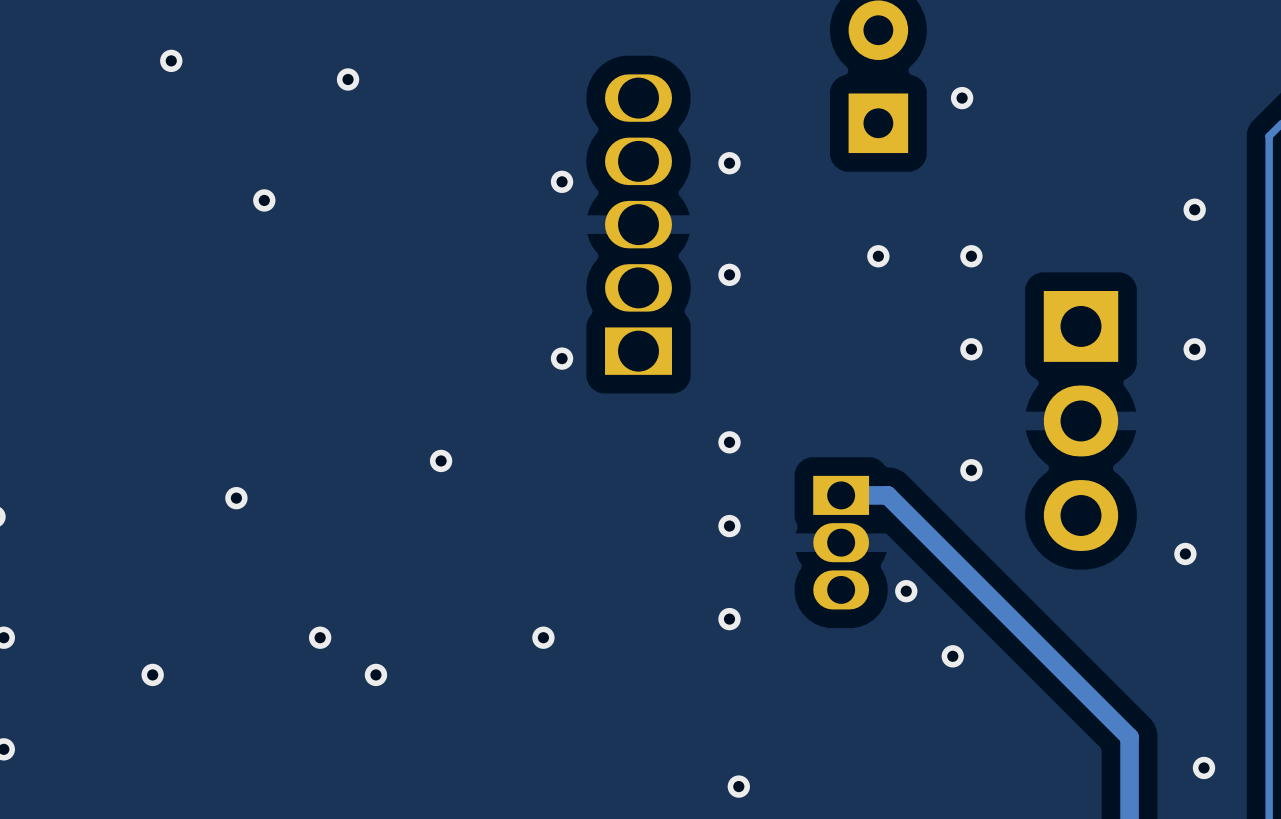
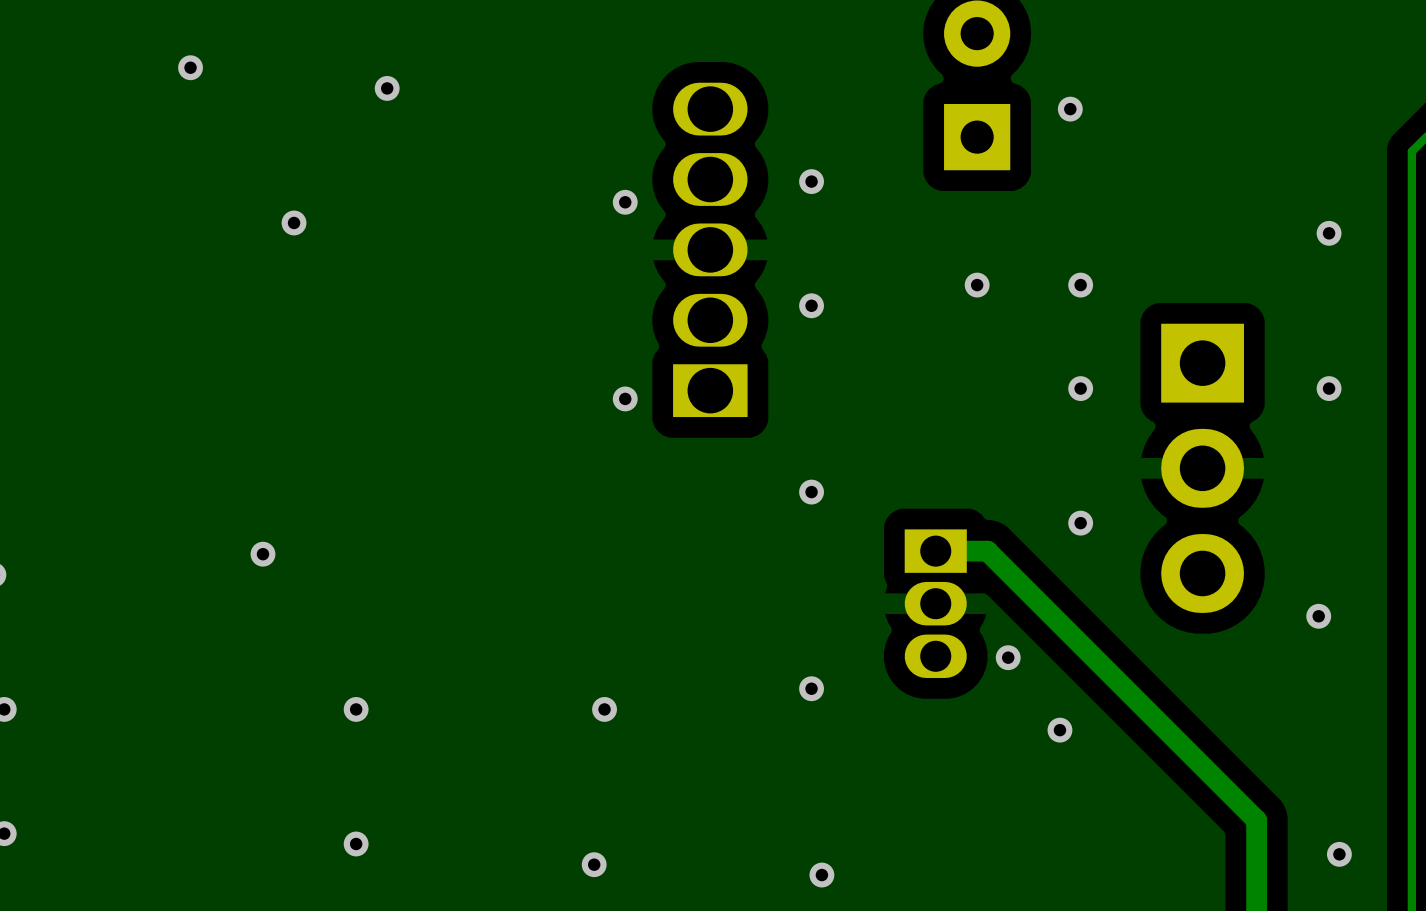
via: (441, 460) -> none
via: (729, 526) -> none
via: (152, 674) -> none
via: (375, 674) -> none
via: none -> (356, 843)
via: none -> (594, 864)

